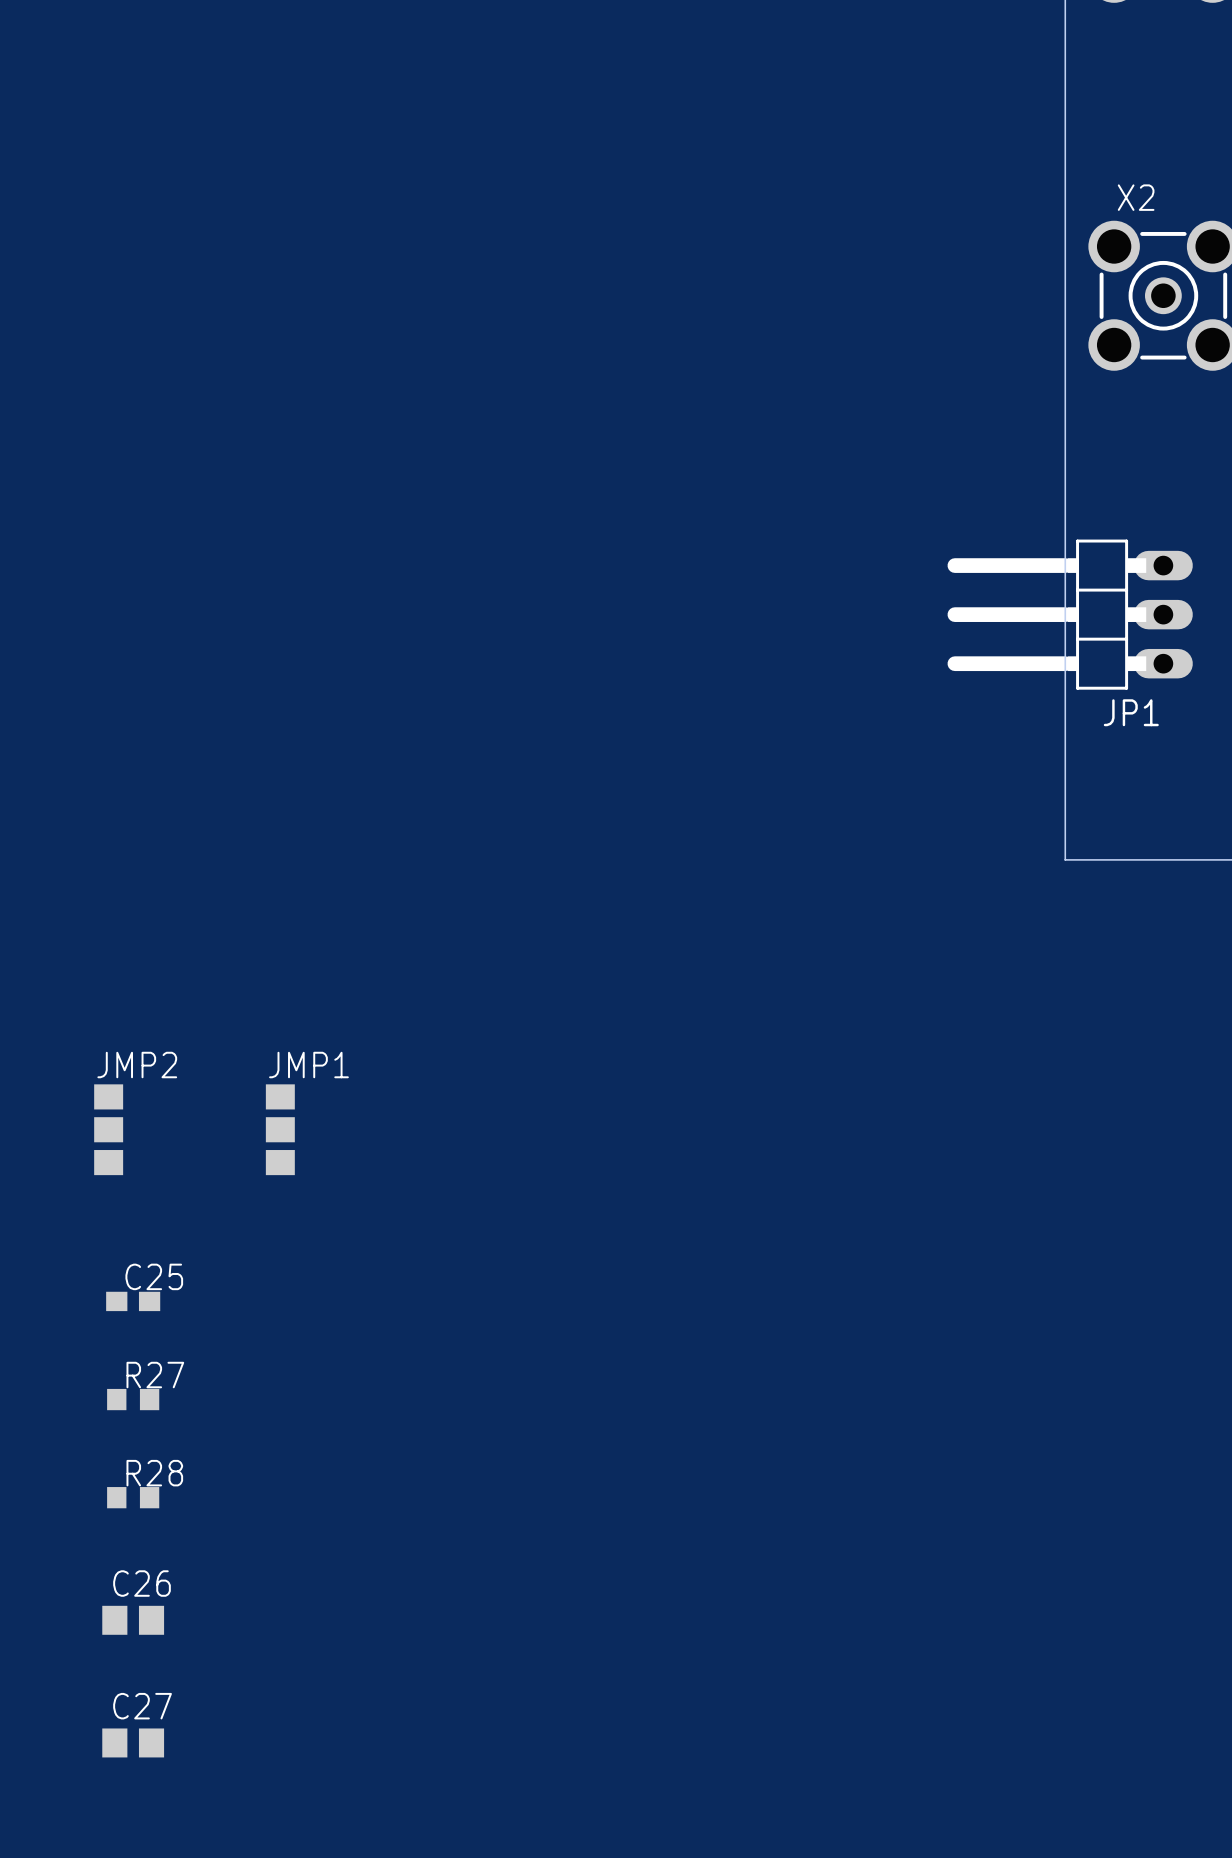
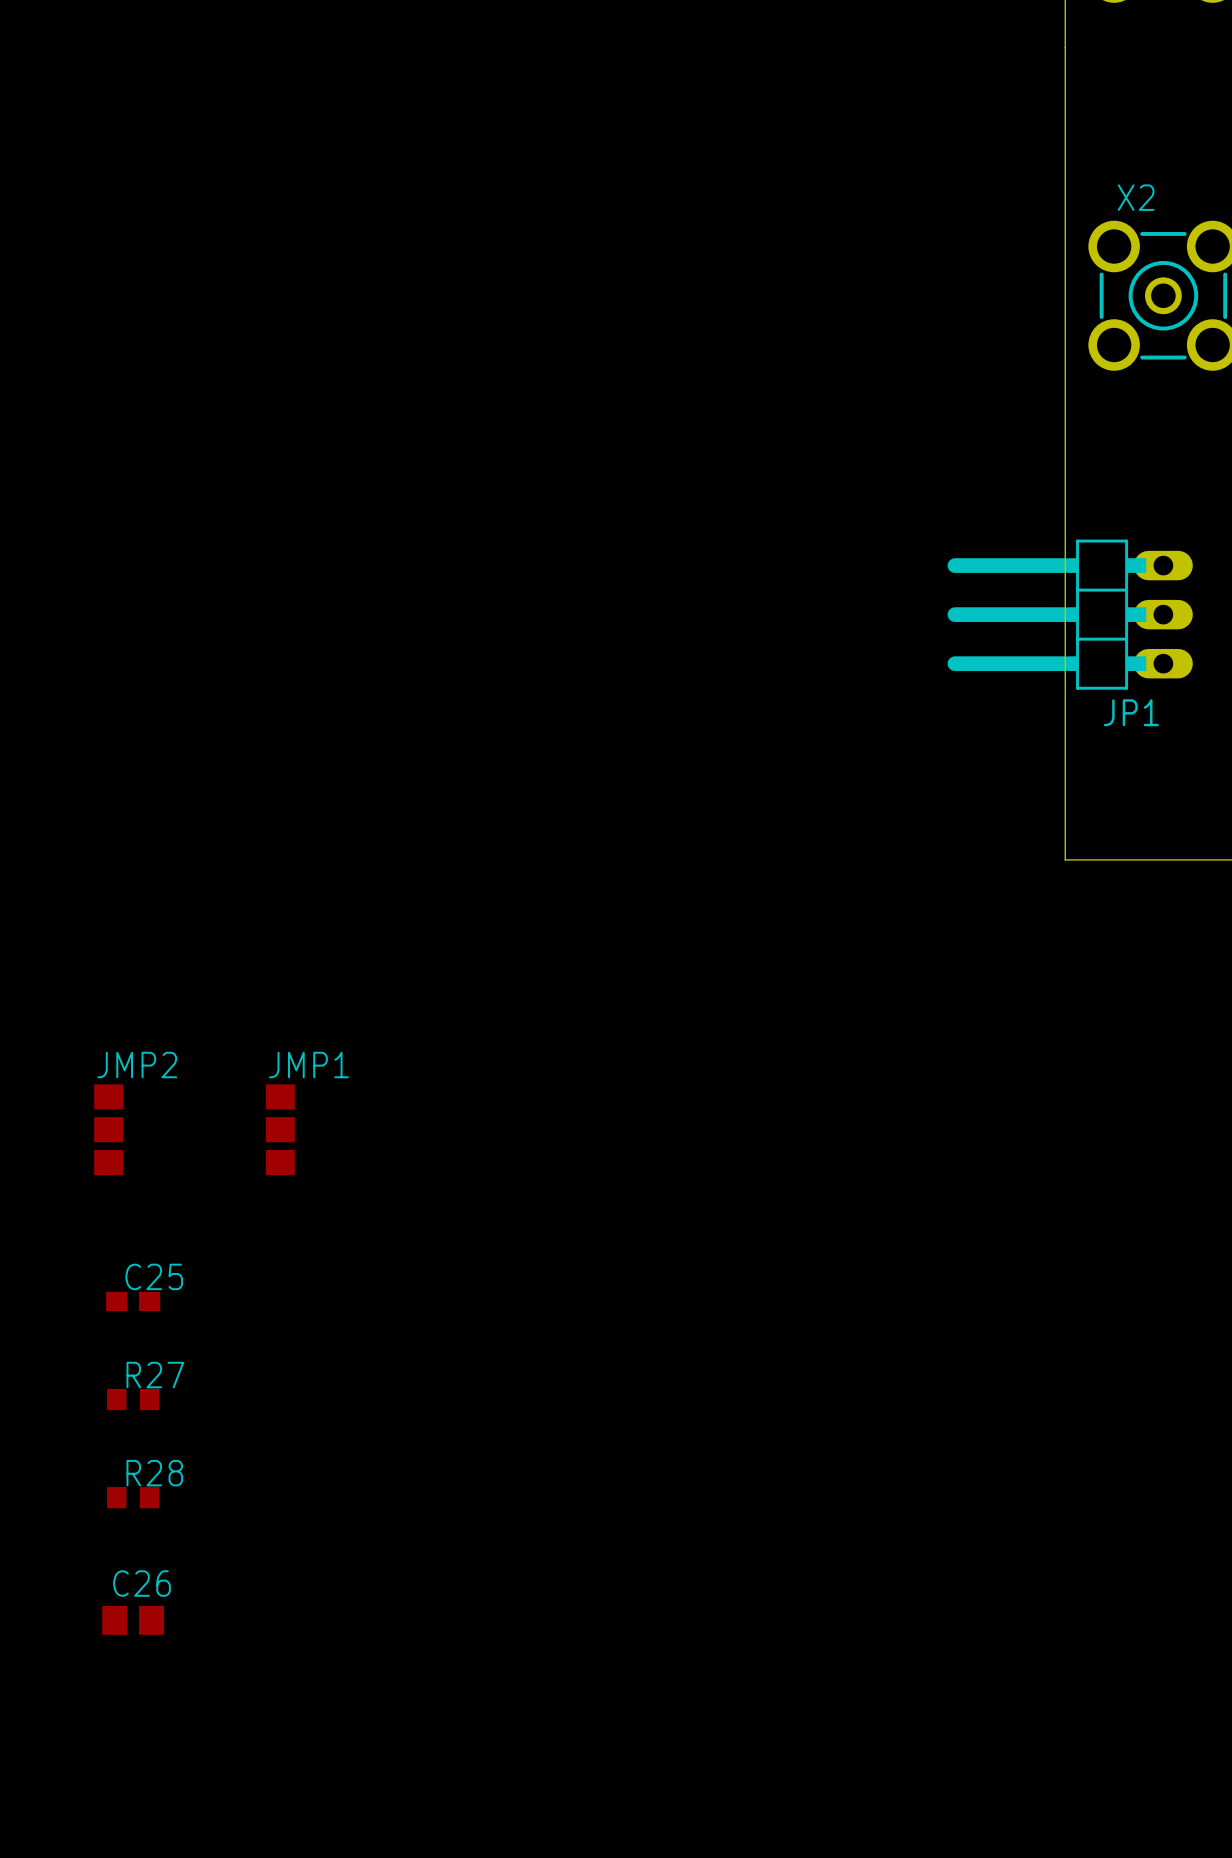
C27: (133, 1742) -> none

